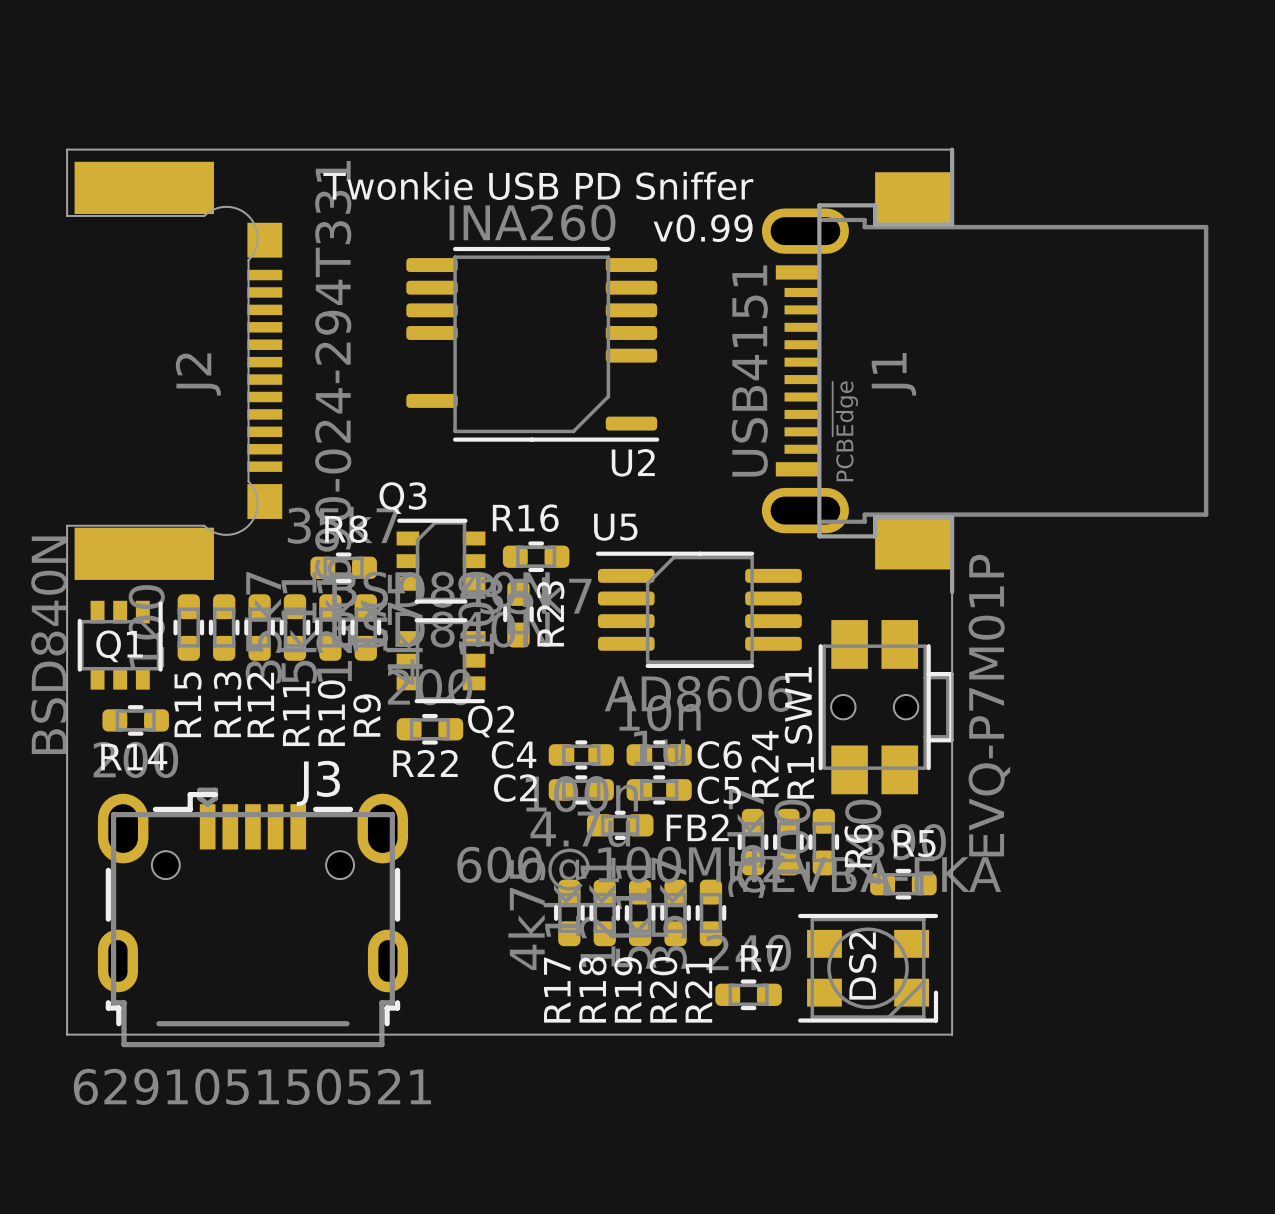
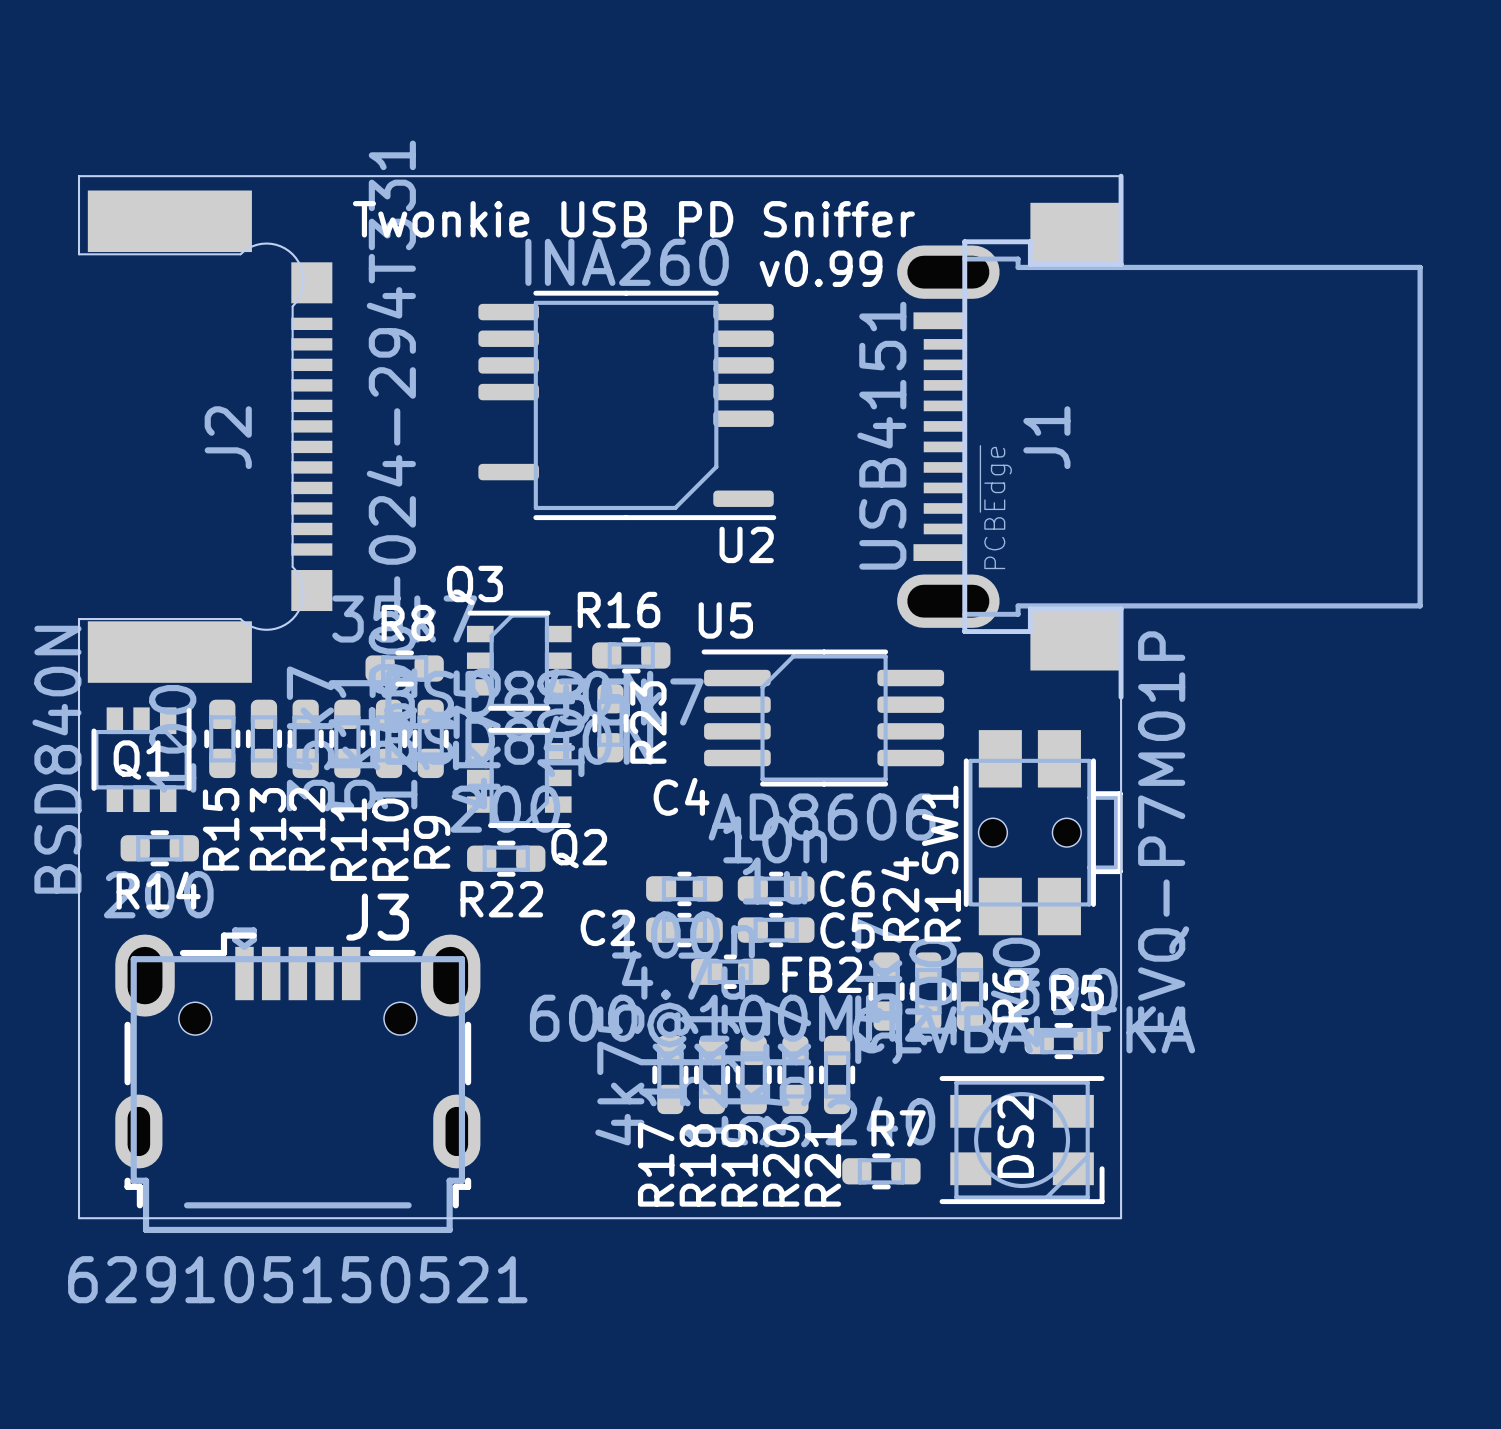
C4 name position: C4 (514, 754) -> C4 (681, 796)

